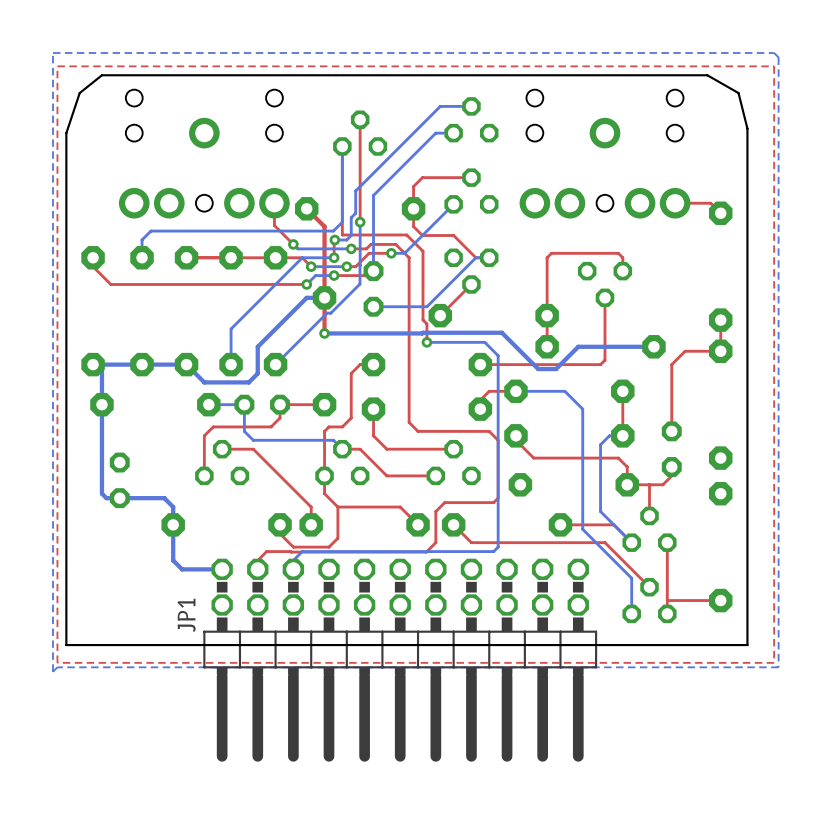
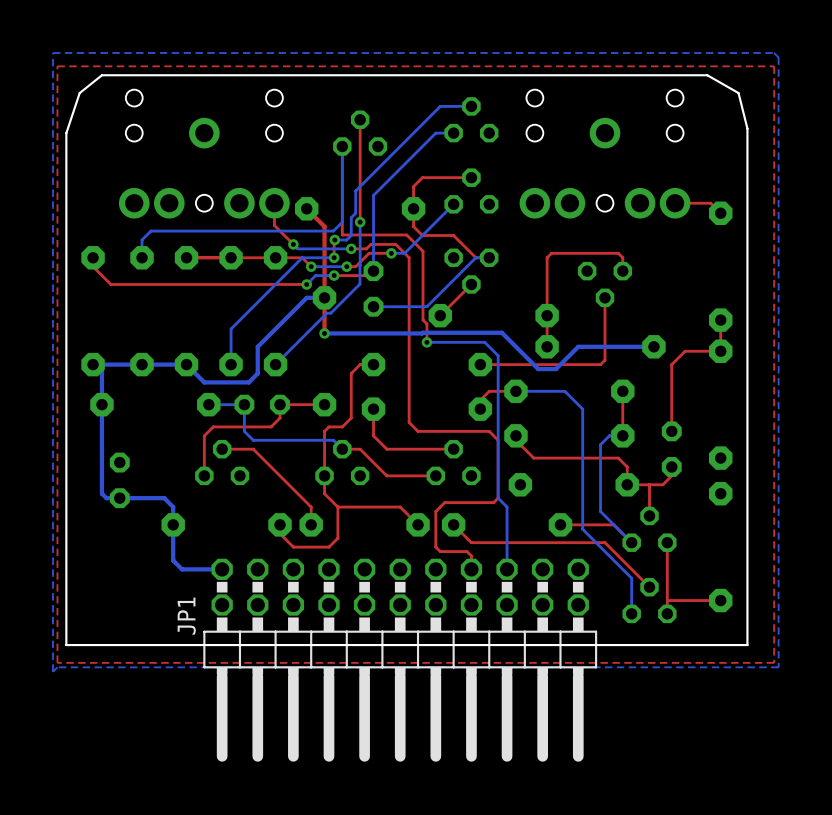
bottom track: (498, 498) (498, 547) (493, 551) (302, 551) (293, 560) (293, 569) -> (498, 498) (507, 507) (507, 569)
top track: (435, 542) (426, 552) (266, 551) (257, 560) (257, 569) -> (435, 542) (435, 547) (440, 551) (466, 551) (471, 556) (471, 569)

